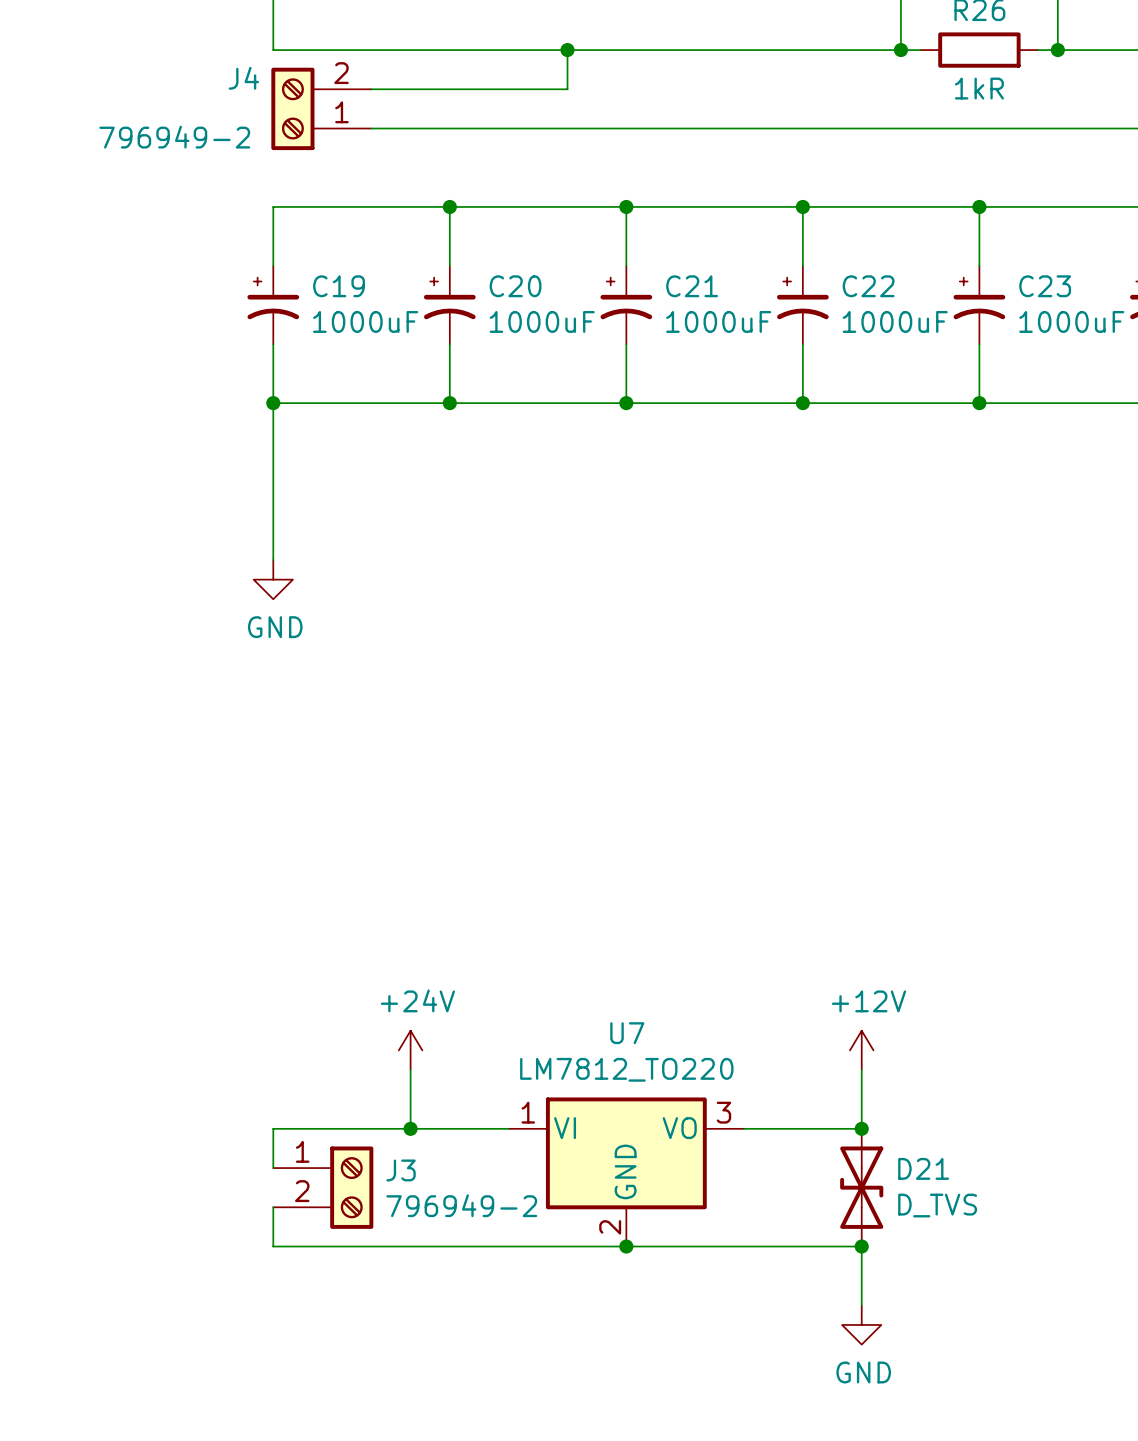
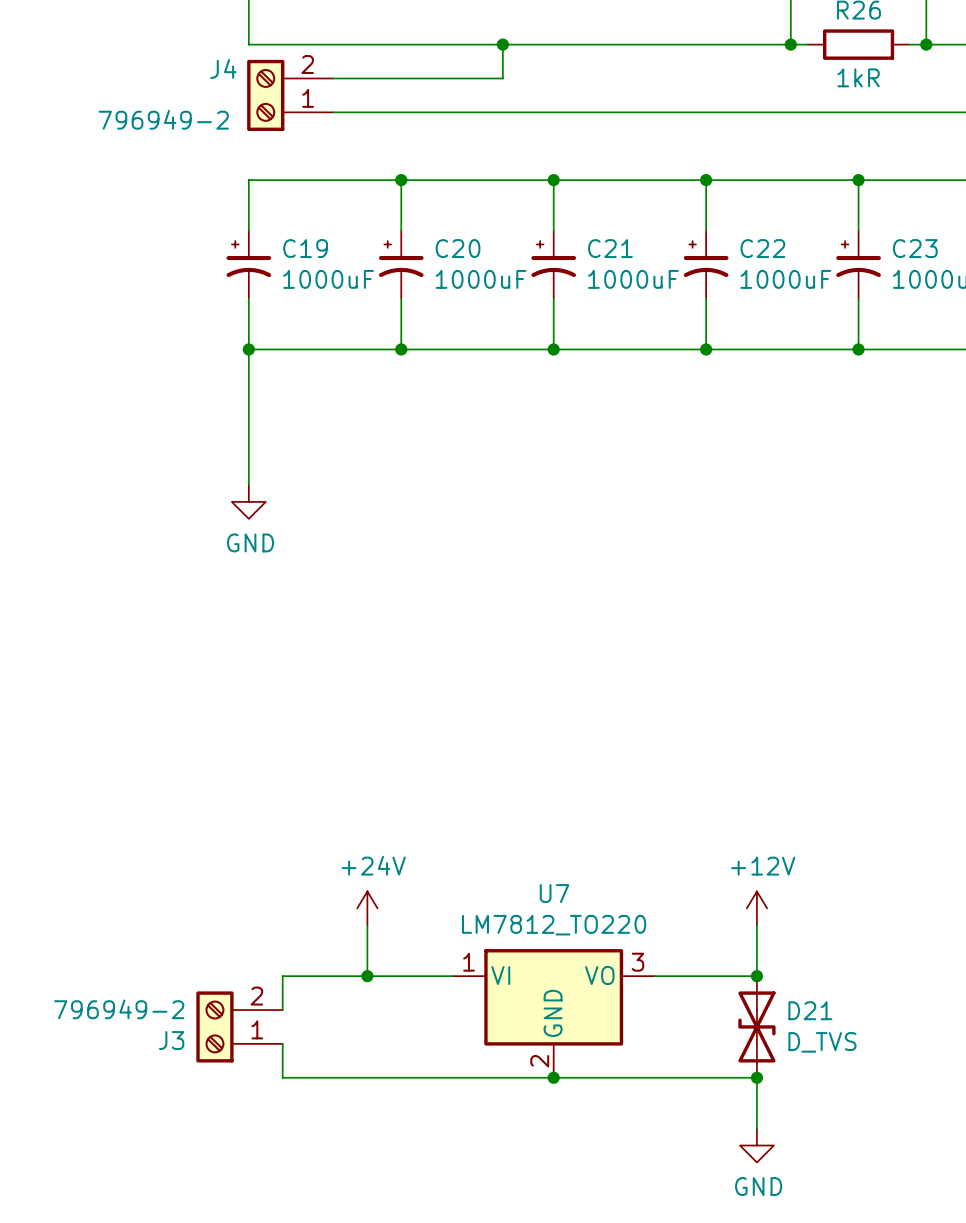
wire: (312, 1128) (273, 1128) (273, 1168) -> (282, 976) (282, 1010)
J3 position: (323, 1187) -> (239, 1026)
J3 rotation: 0° (351, 1187) -> 180° (214, 1026)
wire: (273, 1207) (273, 1246) (312, 1246) -> (282, 1043) (282, 1077)

